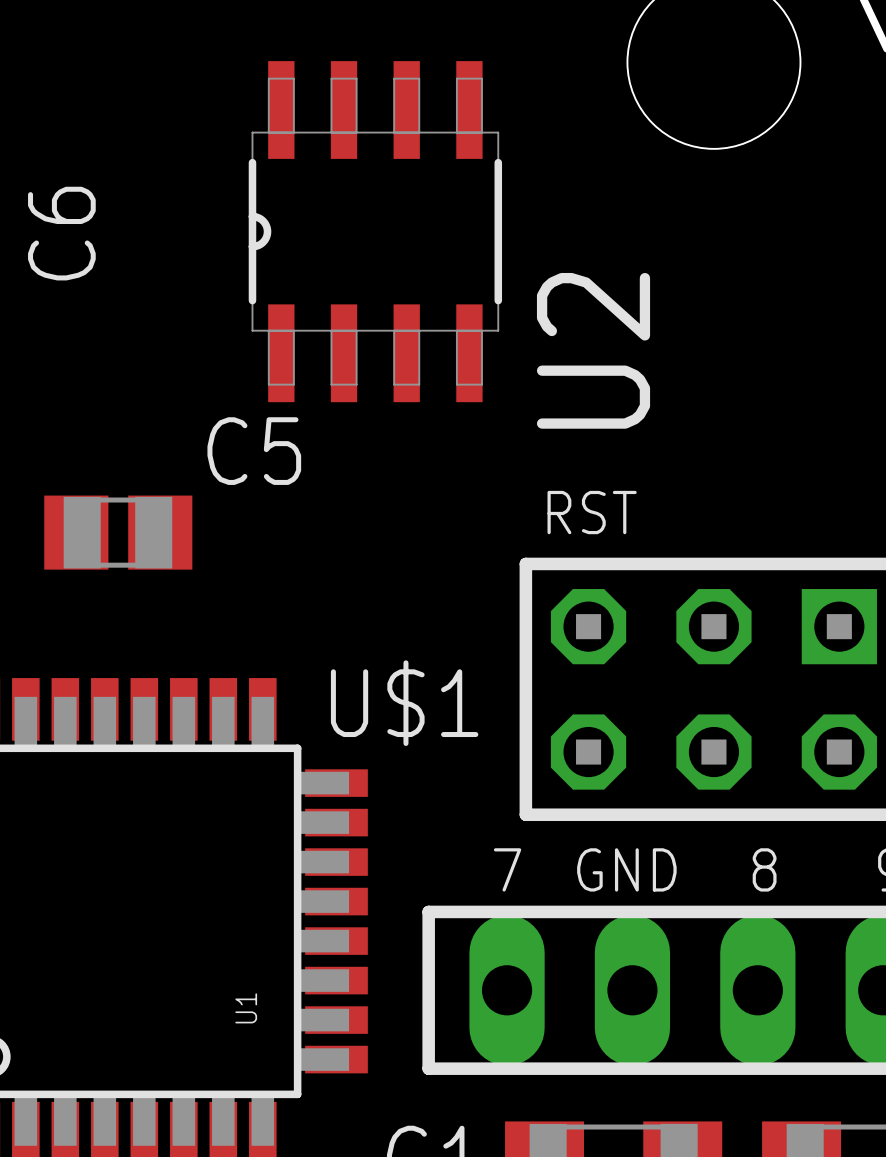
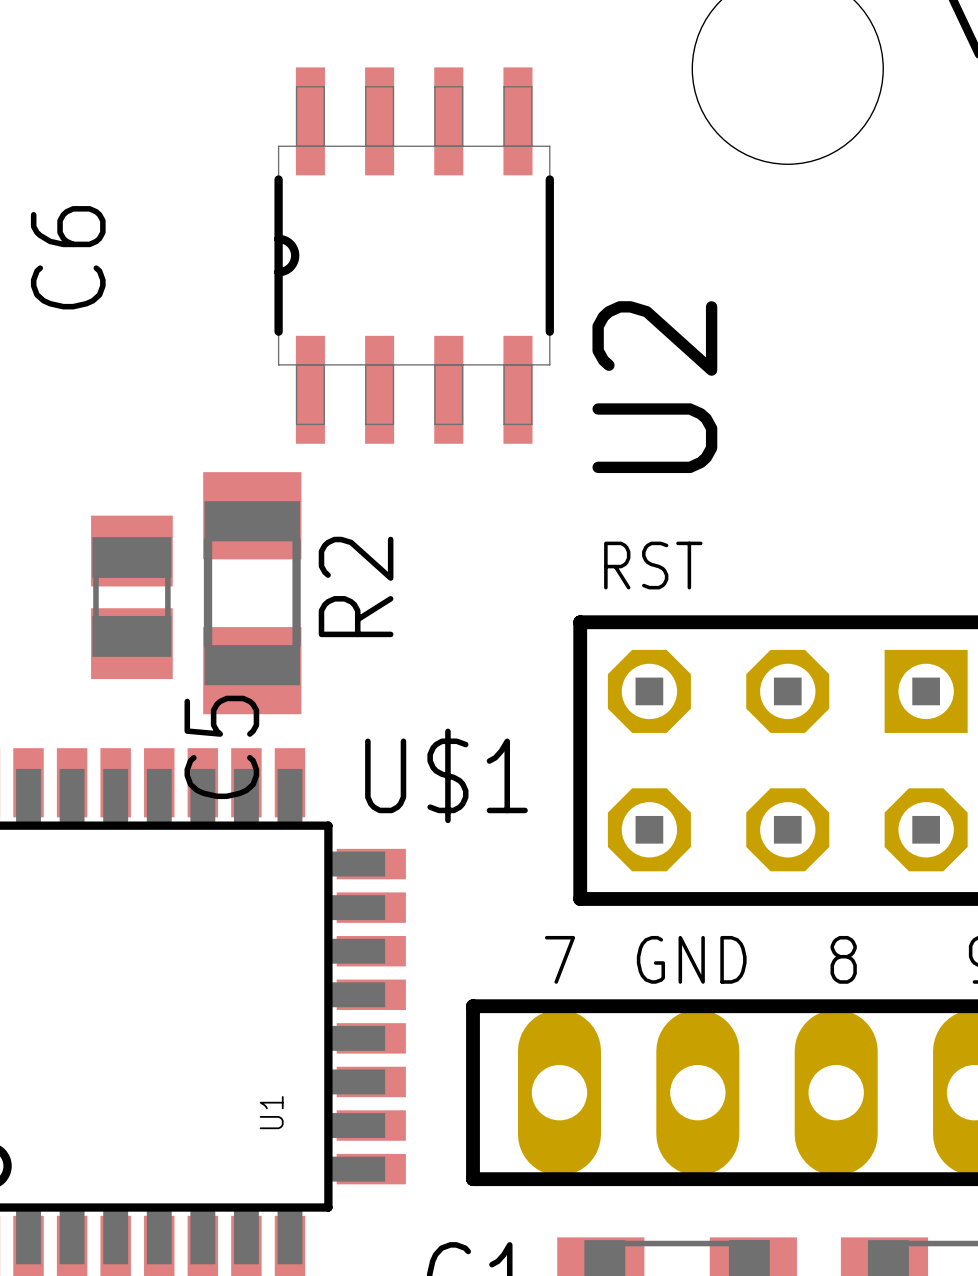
C5 rotation: 0° (118, 532) -> 90° clockwise (131, 597)
R2: none -> (252, 593)

